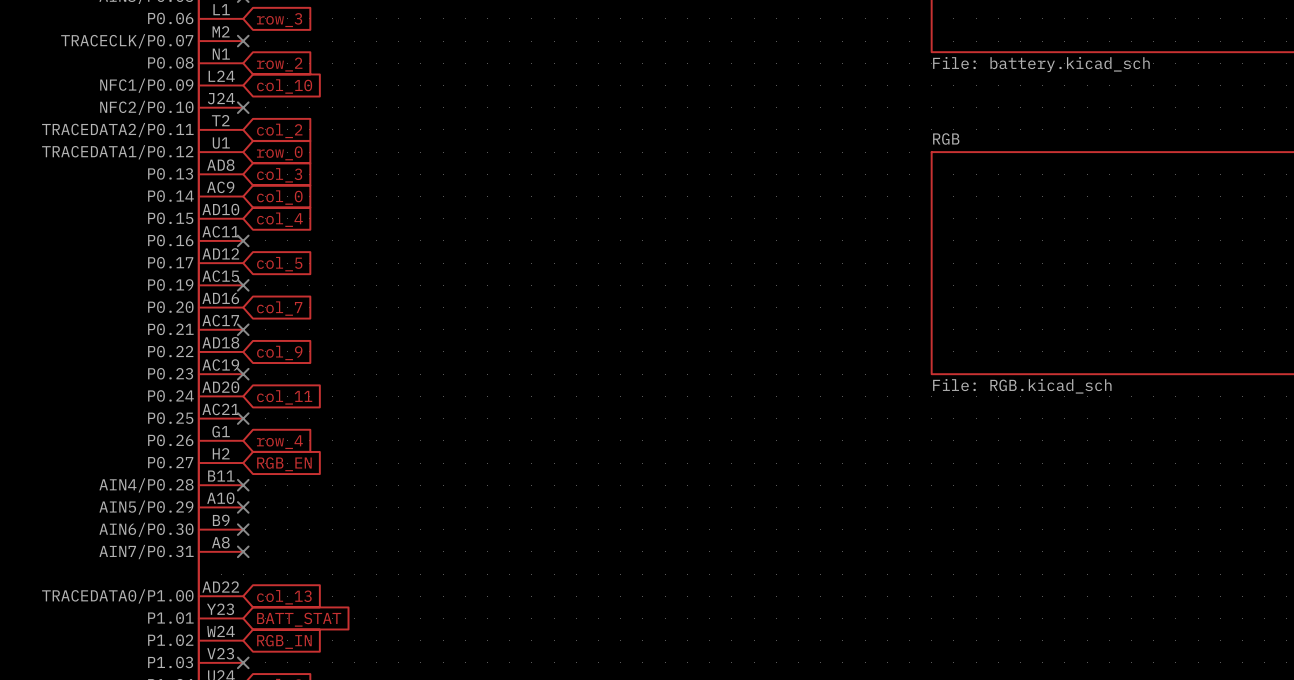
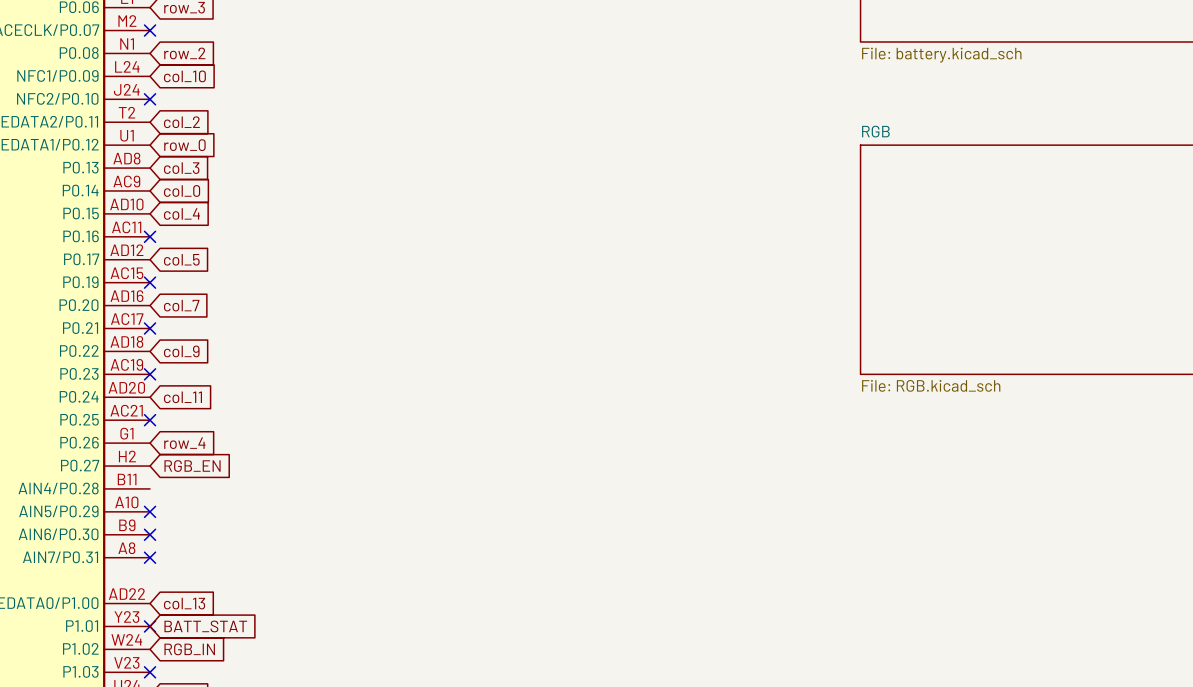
no-connect mark: (243, 485) -> none
no-connect mark: none -> (150, 626)

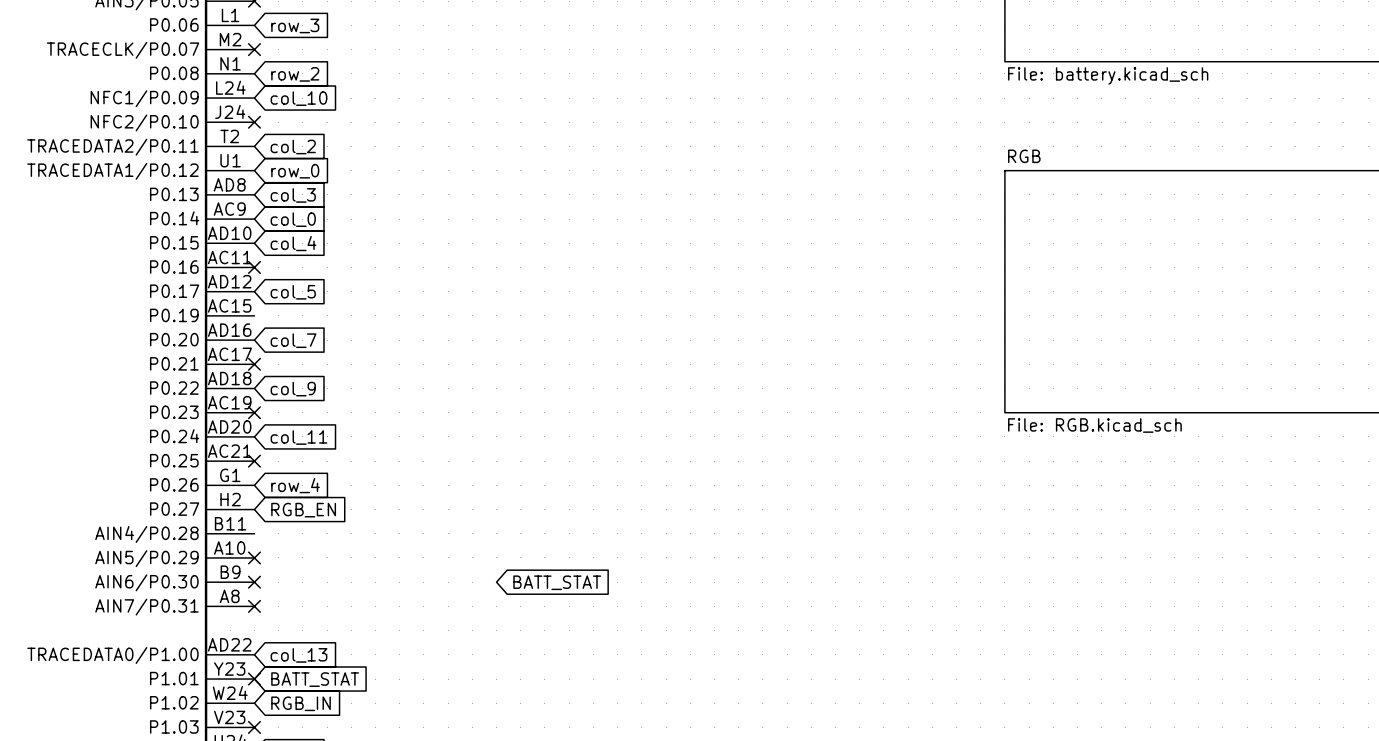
no-connect mark: (150, 282) -> none
global label: none -> BATT_STAT (557, 582)

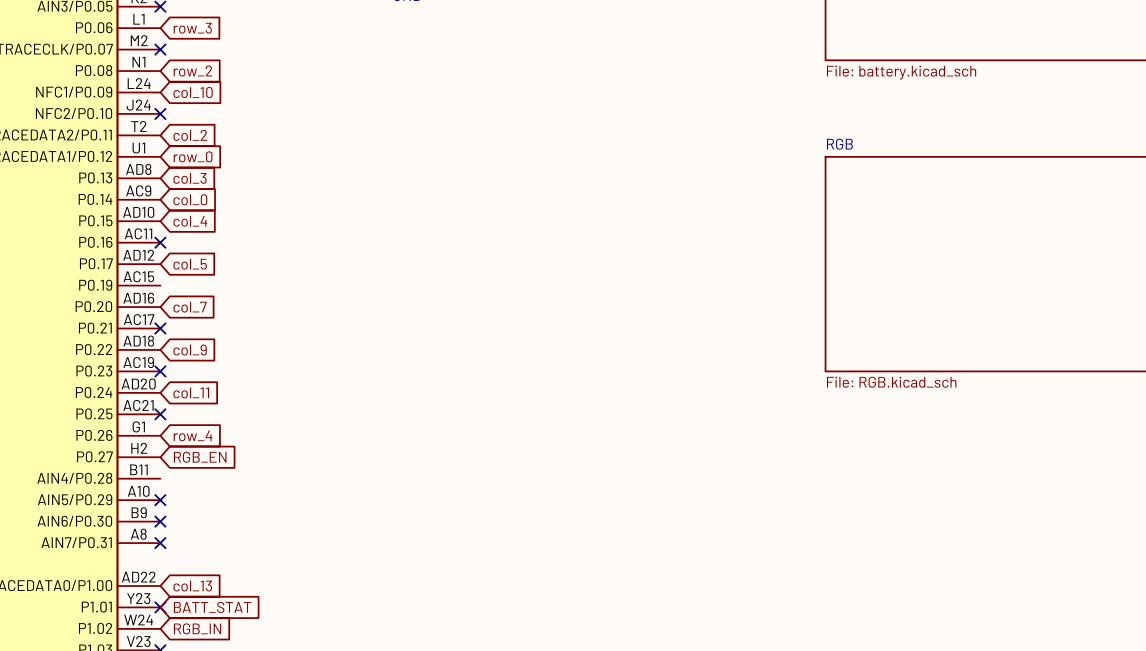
global label: BATT_STAT (557, 582) -> none

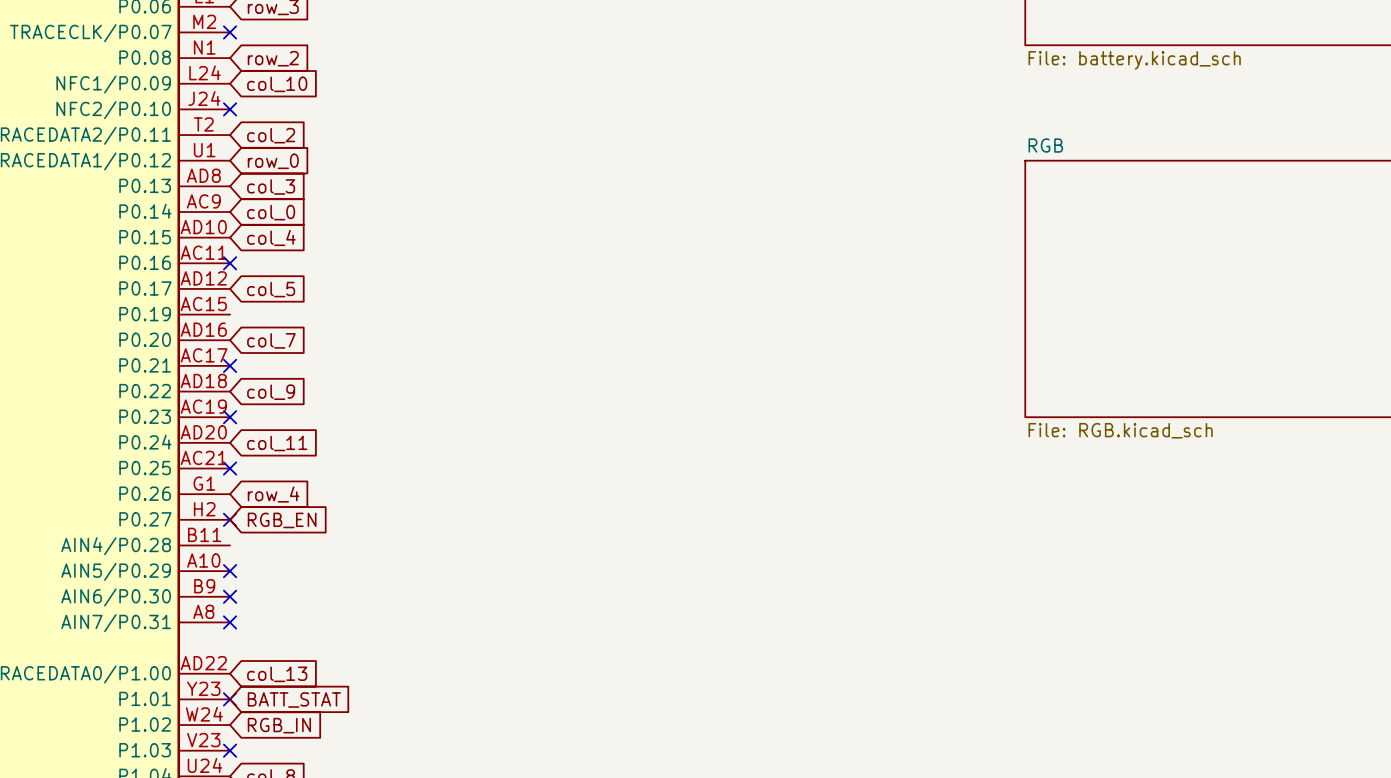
no-connect mark: none -> (230, 519)

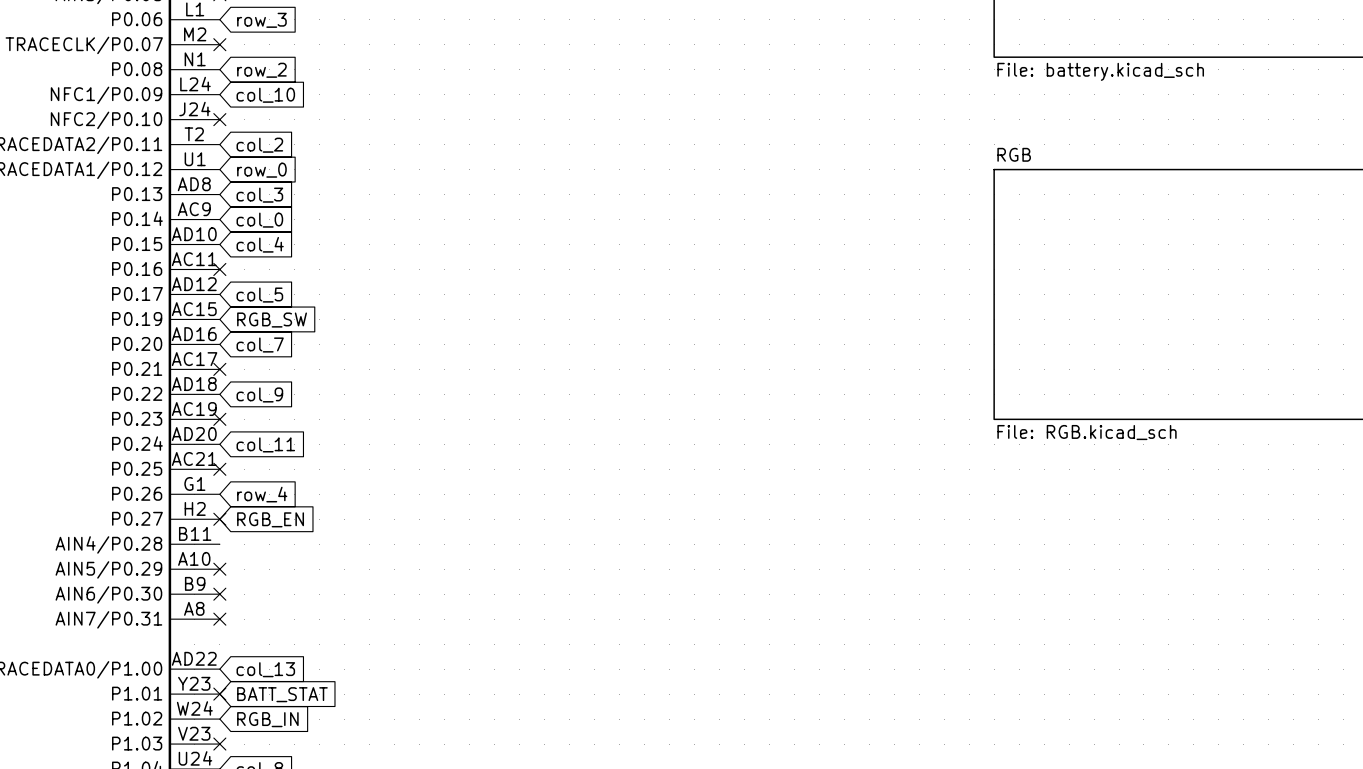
global label: none -> RGB_SW (272, 320)

